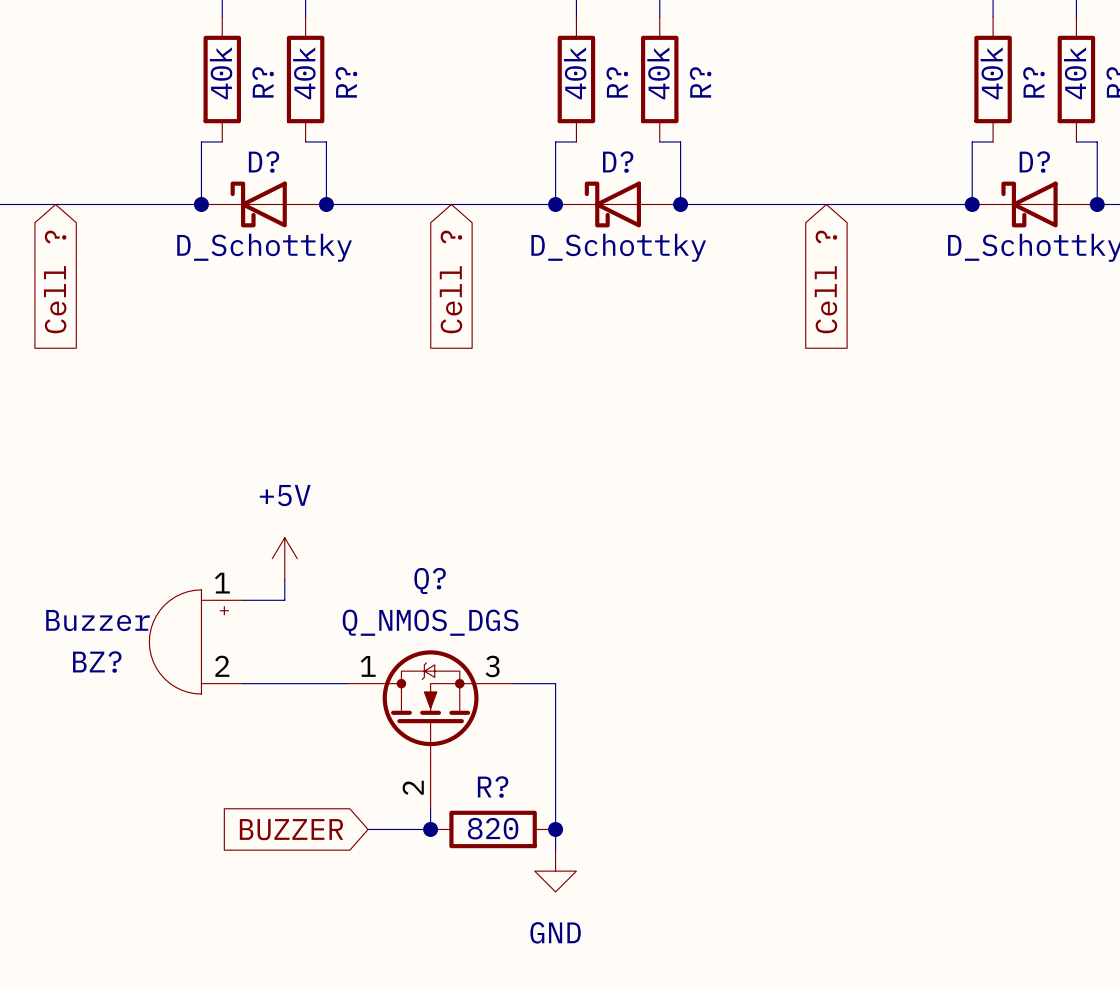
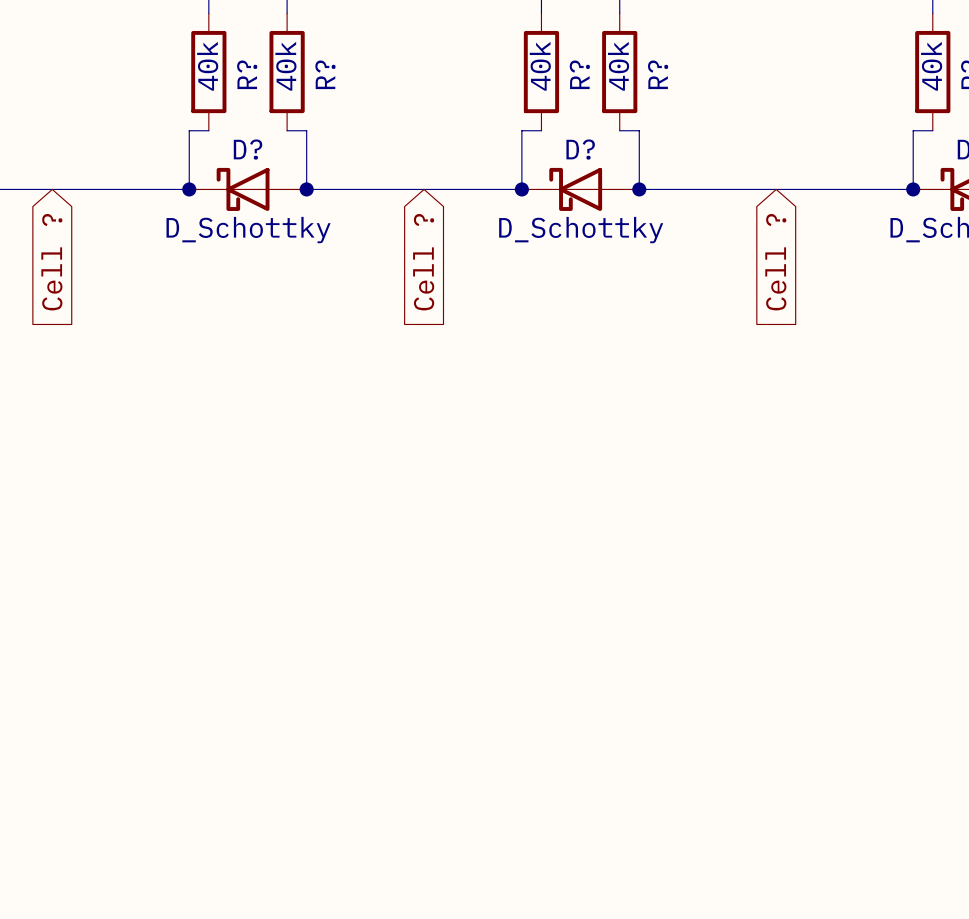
power symbol: +5V (284, 558) -> none
wire: (284, 579) (284, 600) (243, 600) -> none
BZ?: Buzzer (196, 641) -> none
wire: (243, 683) (347, 683) -> none
wire: (513, 683) (555, 683) (555, 850) -> none
Q?: Q_NMOS_DGS (430, 729) -> none
wire: (430, 808) (430, 829) (368, 829) -> none
global label: BUZZER (291, 829) -> none
junction: (430, 829) -> none
R?: 820 (493, 829) -> none
junction: (555, 829) -> none
power symbol: GND (555, 871) -> none

